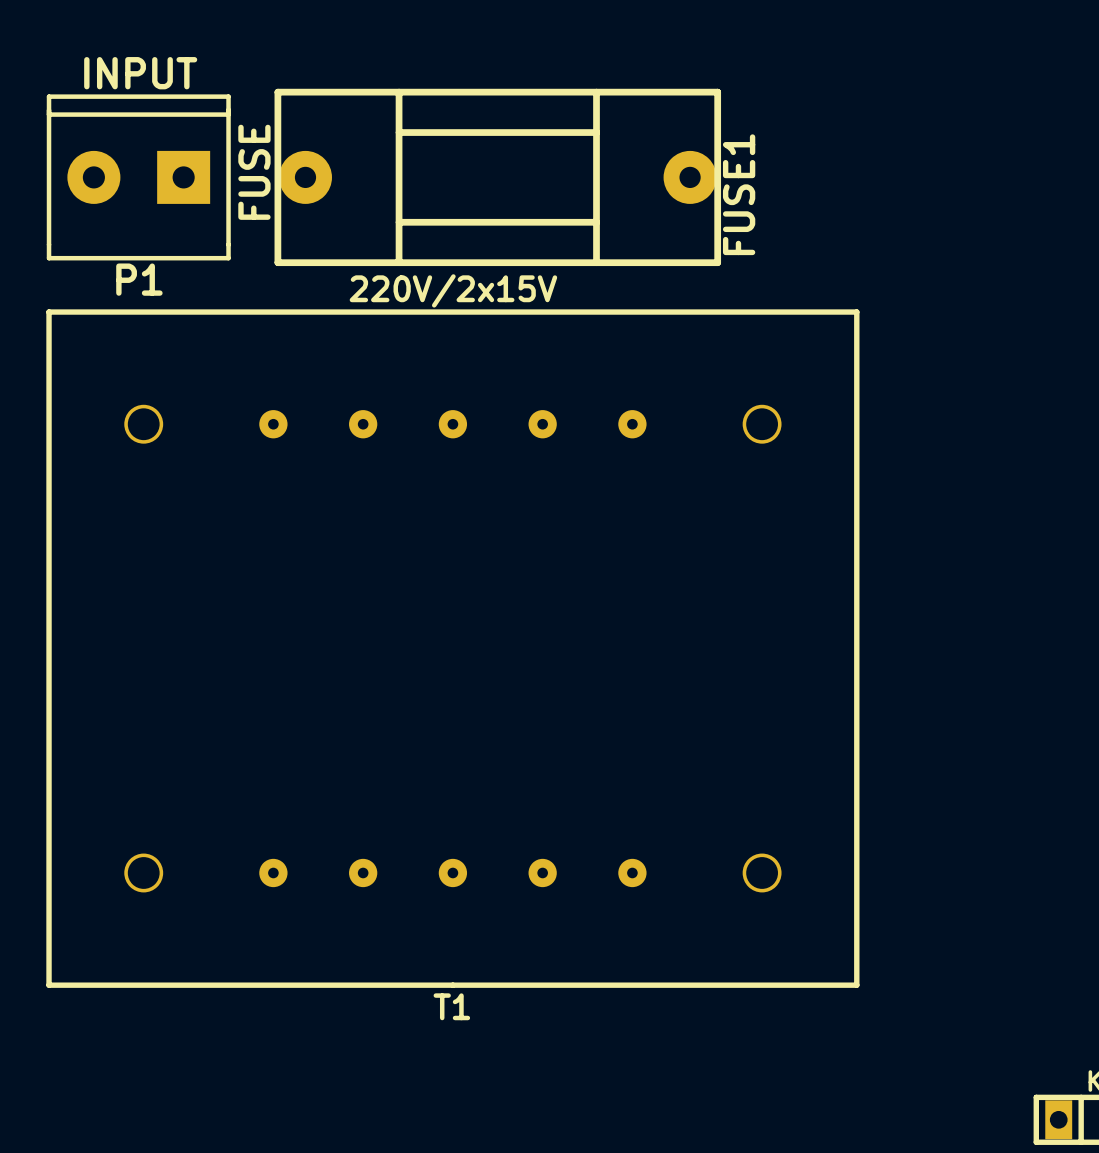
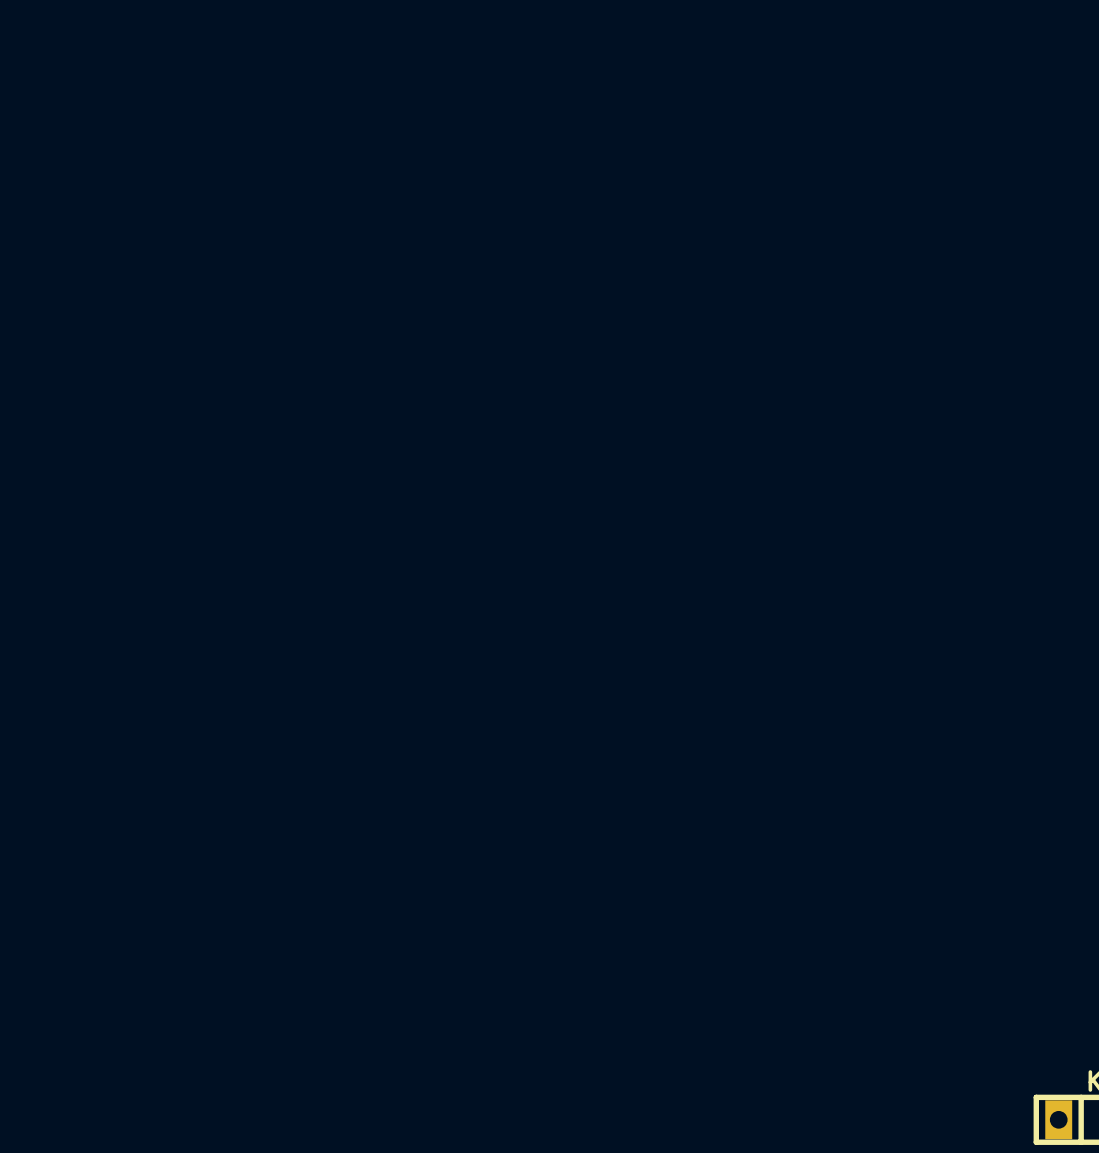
P1: INPUT (138, 177) -> none
FUSE1: FUSE (497, 177) -> none
T1: 220V/2x15V (452, 648) -> none

